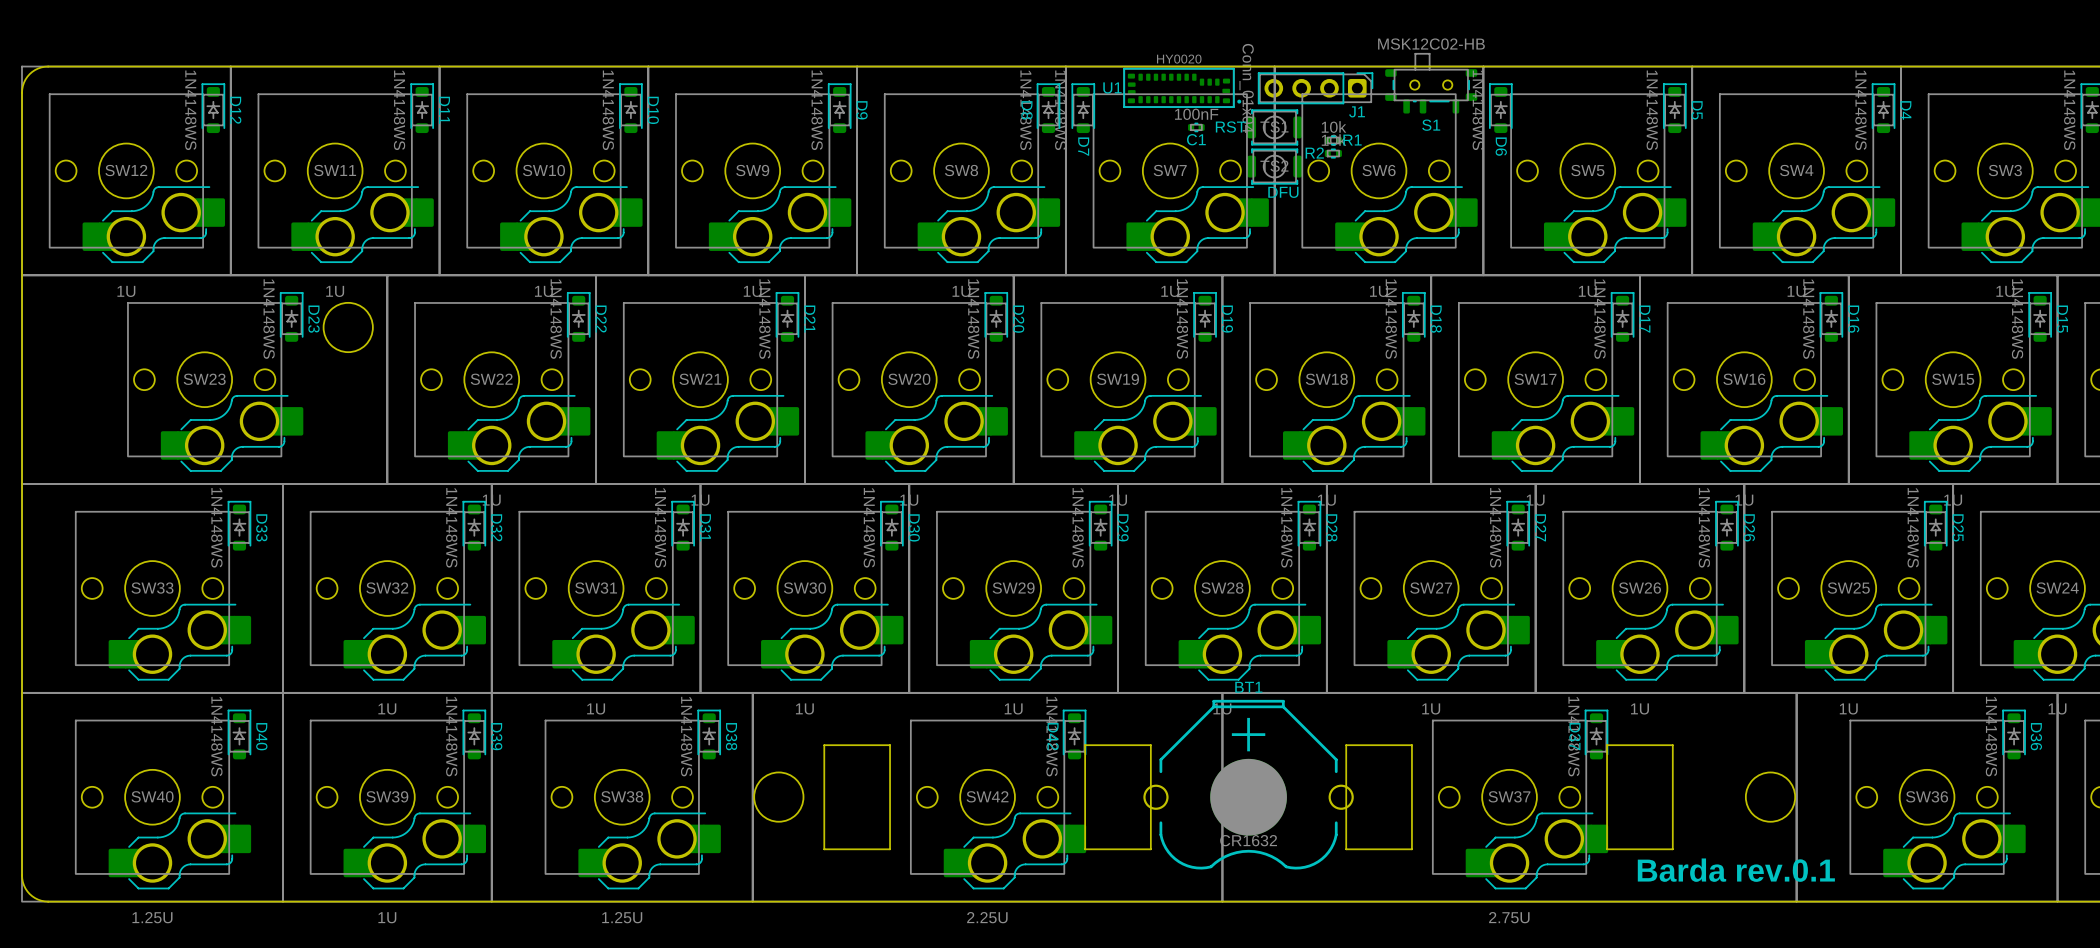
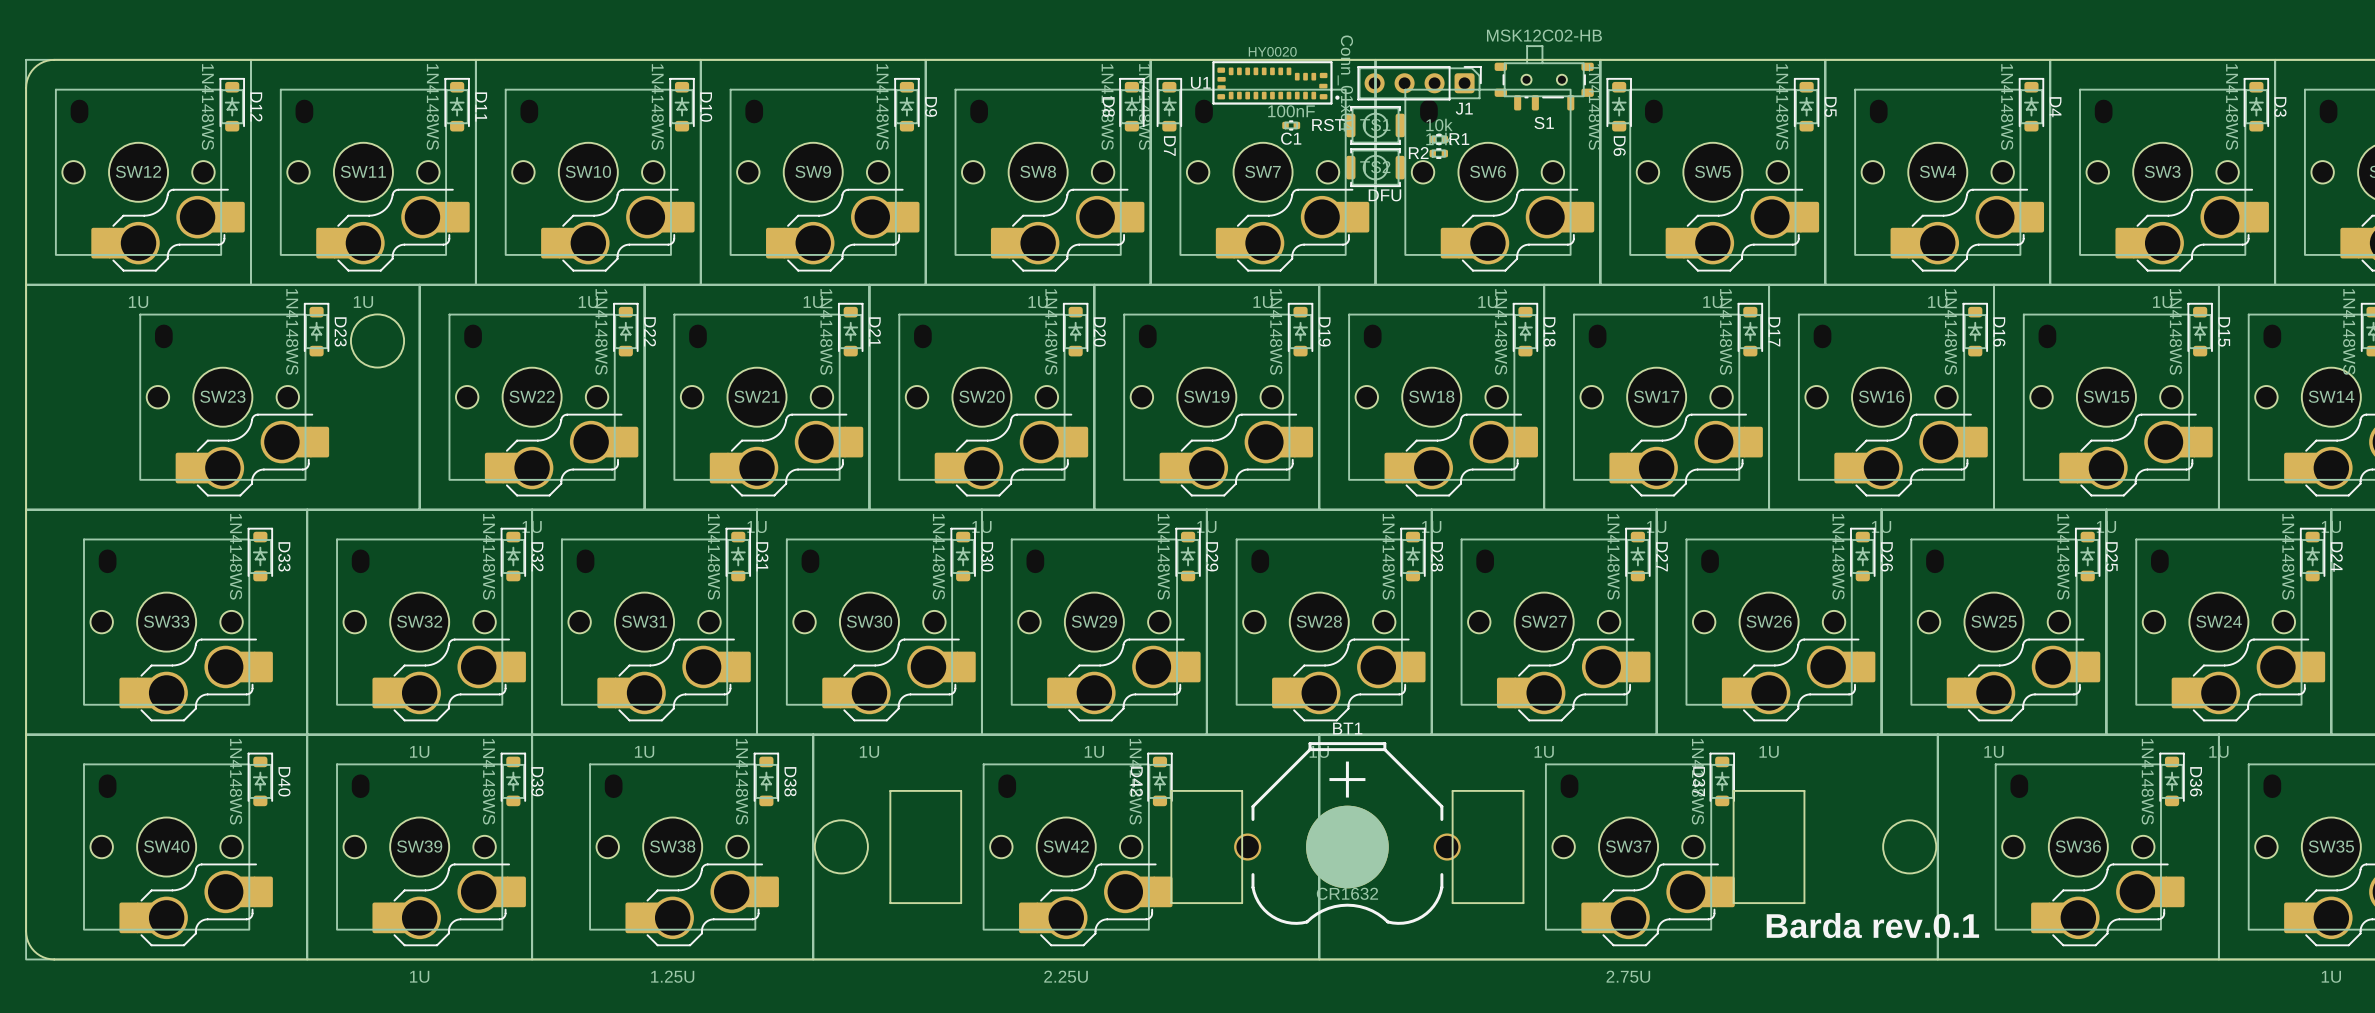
SW40 value: 1.25U (152, 917) -> none

